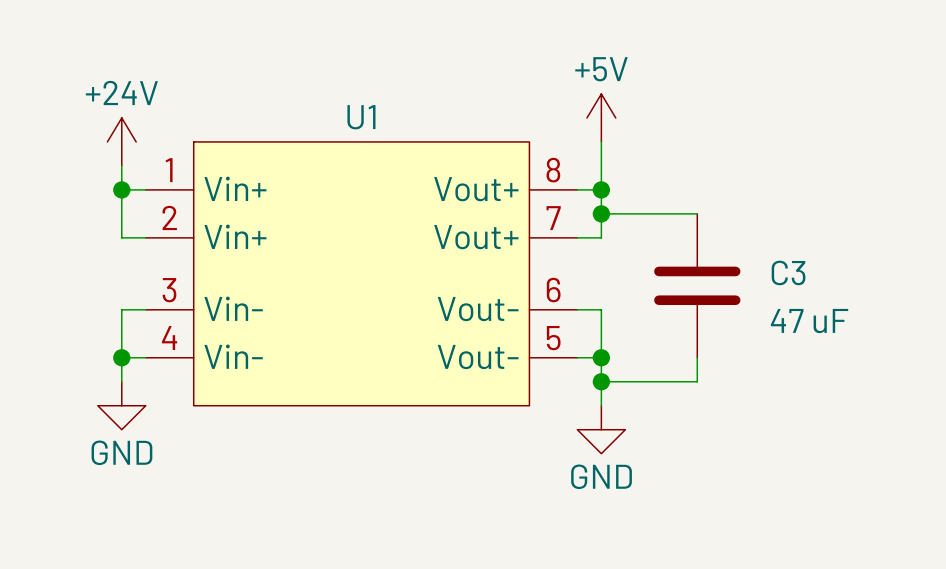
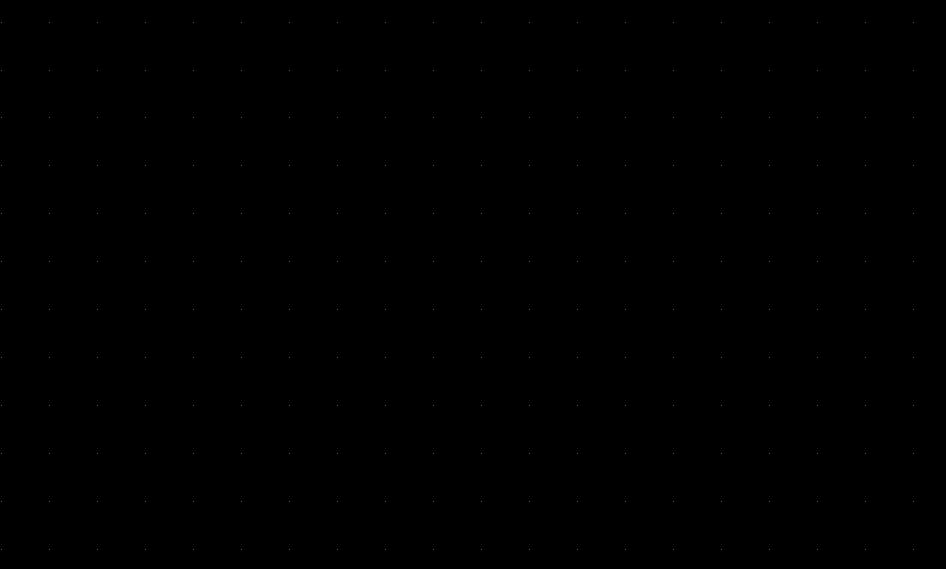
power symbol: +5V (601, 117) -> none
power symbol: +24V (121, 141) -> none
wire: (601, 141) (601, 237) (577, 237) -> none
wire: (121, 165) (121, 237) (145, 237) -> none
wire: (121, 189) (145, 189) -> none
junction: (121, 189) -> none
wire: (577, 189) (601, 189) -> none
junction: (601, 189) -> none
wire: (601, 213) (697, 213) -> none
junction: (601, 213) -> none
U1: (361, 273) -> none
C3: 47 uF (697, 285) -> none
wire: (145, 309) (121, 309) (121, 381) -> none
wire: (577, 309) (601, 309) (601, 405) -> none
wire: (121, 357) (145, 357) -> none
junction: (121, 357) -> none
wire: (577, 357) (601, 357) -> none
junction: (601, 357) -> none
wire: (697, 357) (697, 381) (601, 381) -> none
junction: (601, 381) -> none
power symbol: GND (121, 405) -> none
power symbol: GND (601, 429) -> none

